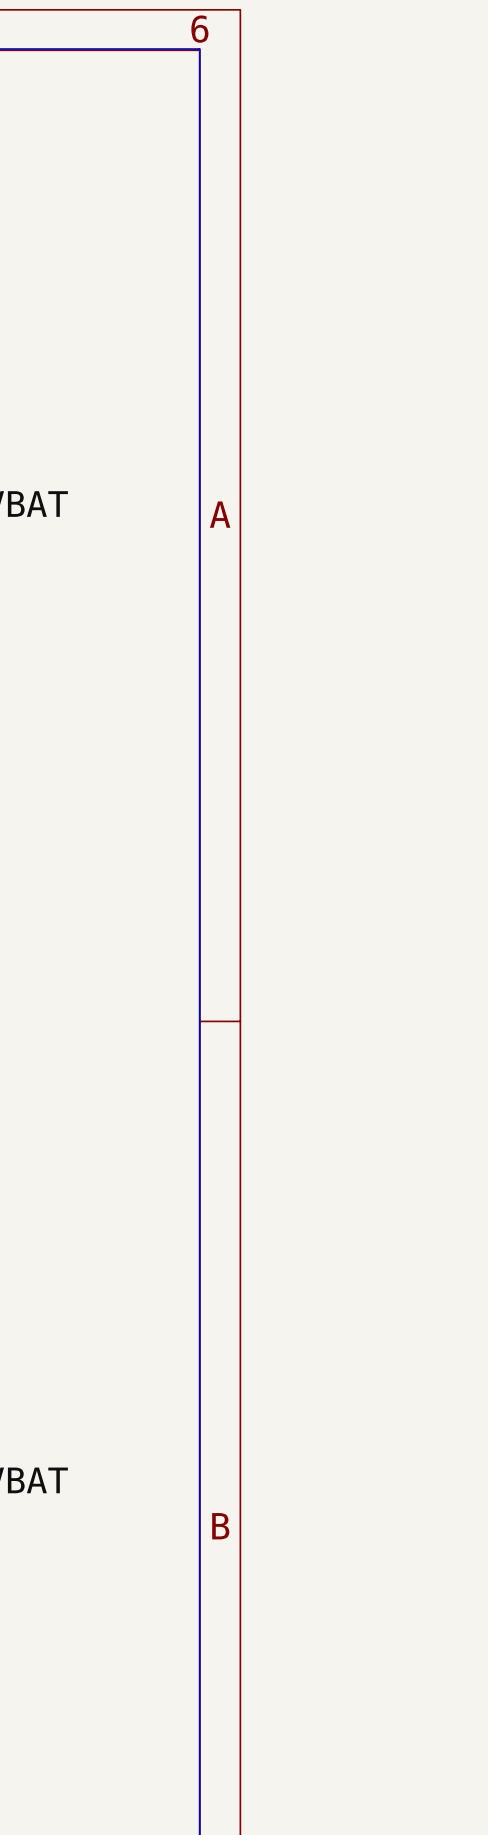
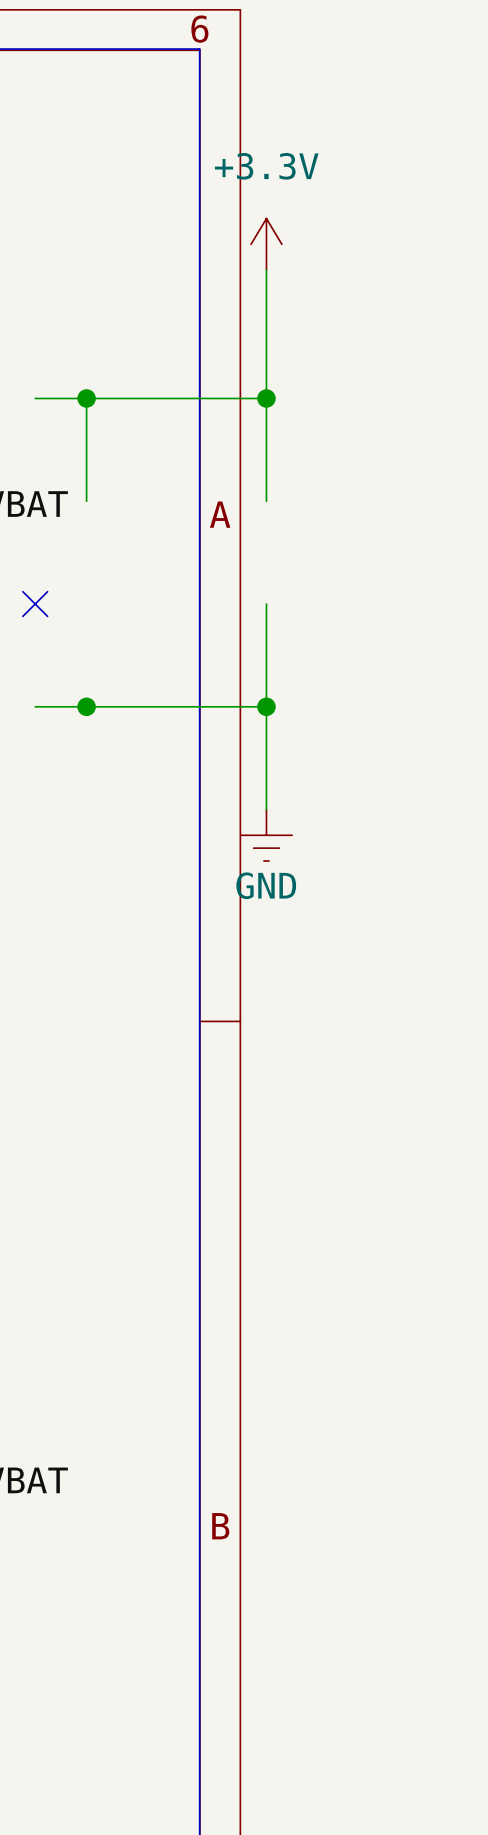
power symbol: none -> +3.3V (266, 244)
wire: none -> (266, 270) (266, 501)
wire: none -> (35, 398) (266, 398)
wire: none -> (86, 398) (86, 501)
junction: none -> (86, 398)
junction: none -> (266, 398)
no-connect mark: none -> (35, 604)
wire: none -> (266, 604) (266, 809)
wire: none -> (35, 706) (266, 706)
junction: none -> (86, 706)
junction: none -> (266, 706)
power symbol: none -> GND (266, 835)

